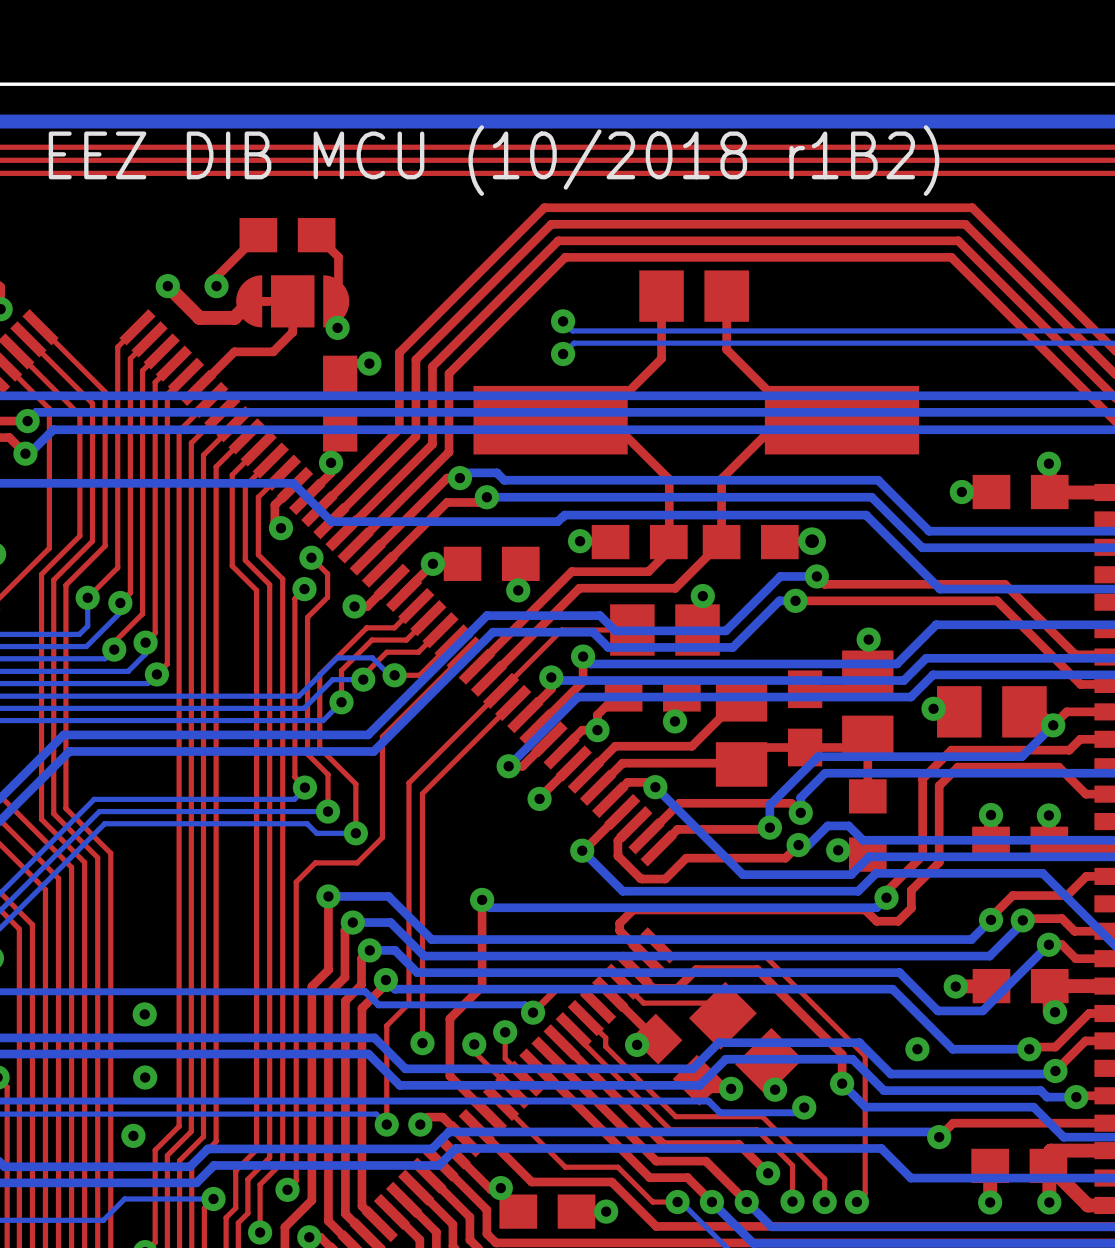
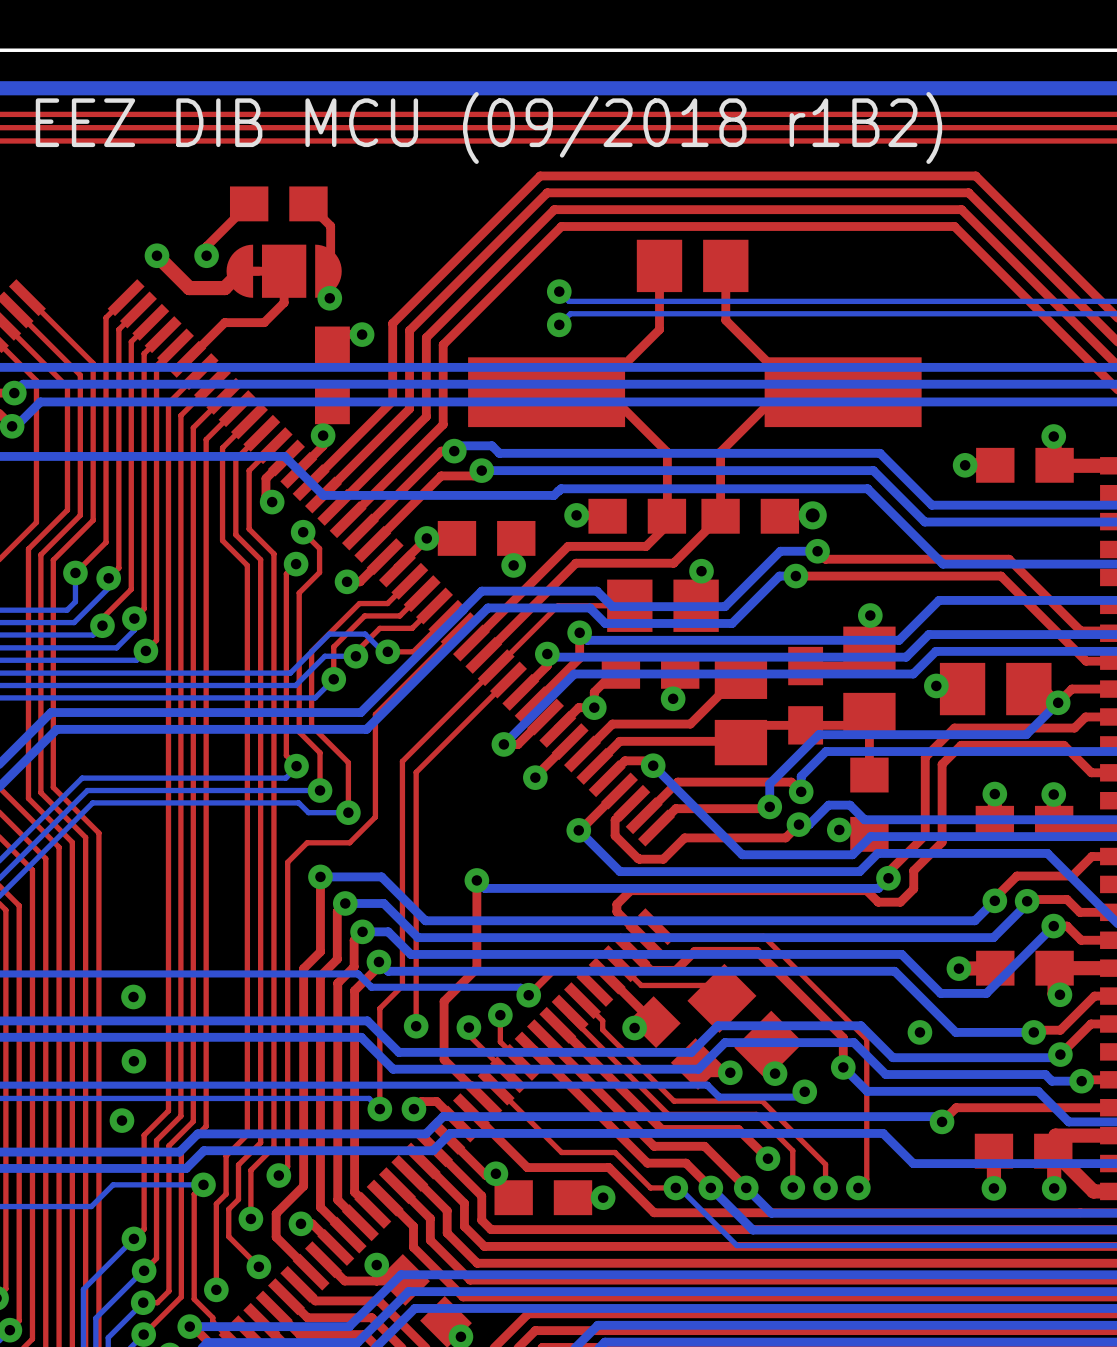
text: EEZ DIB MCU (10/2018 r1B2) (493, 160) -> EEZ DIB MCU (09/2018 r1B2) (488, 127)

